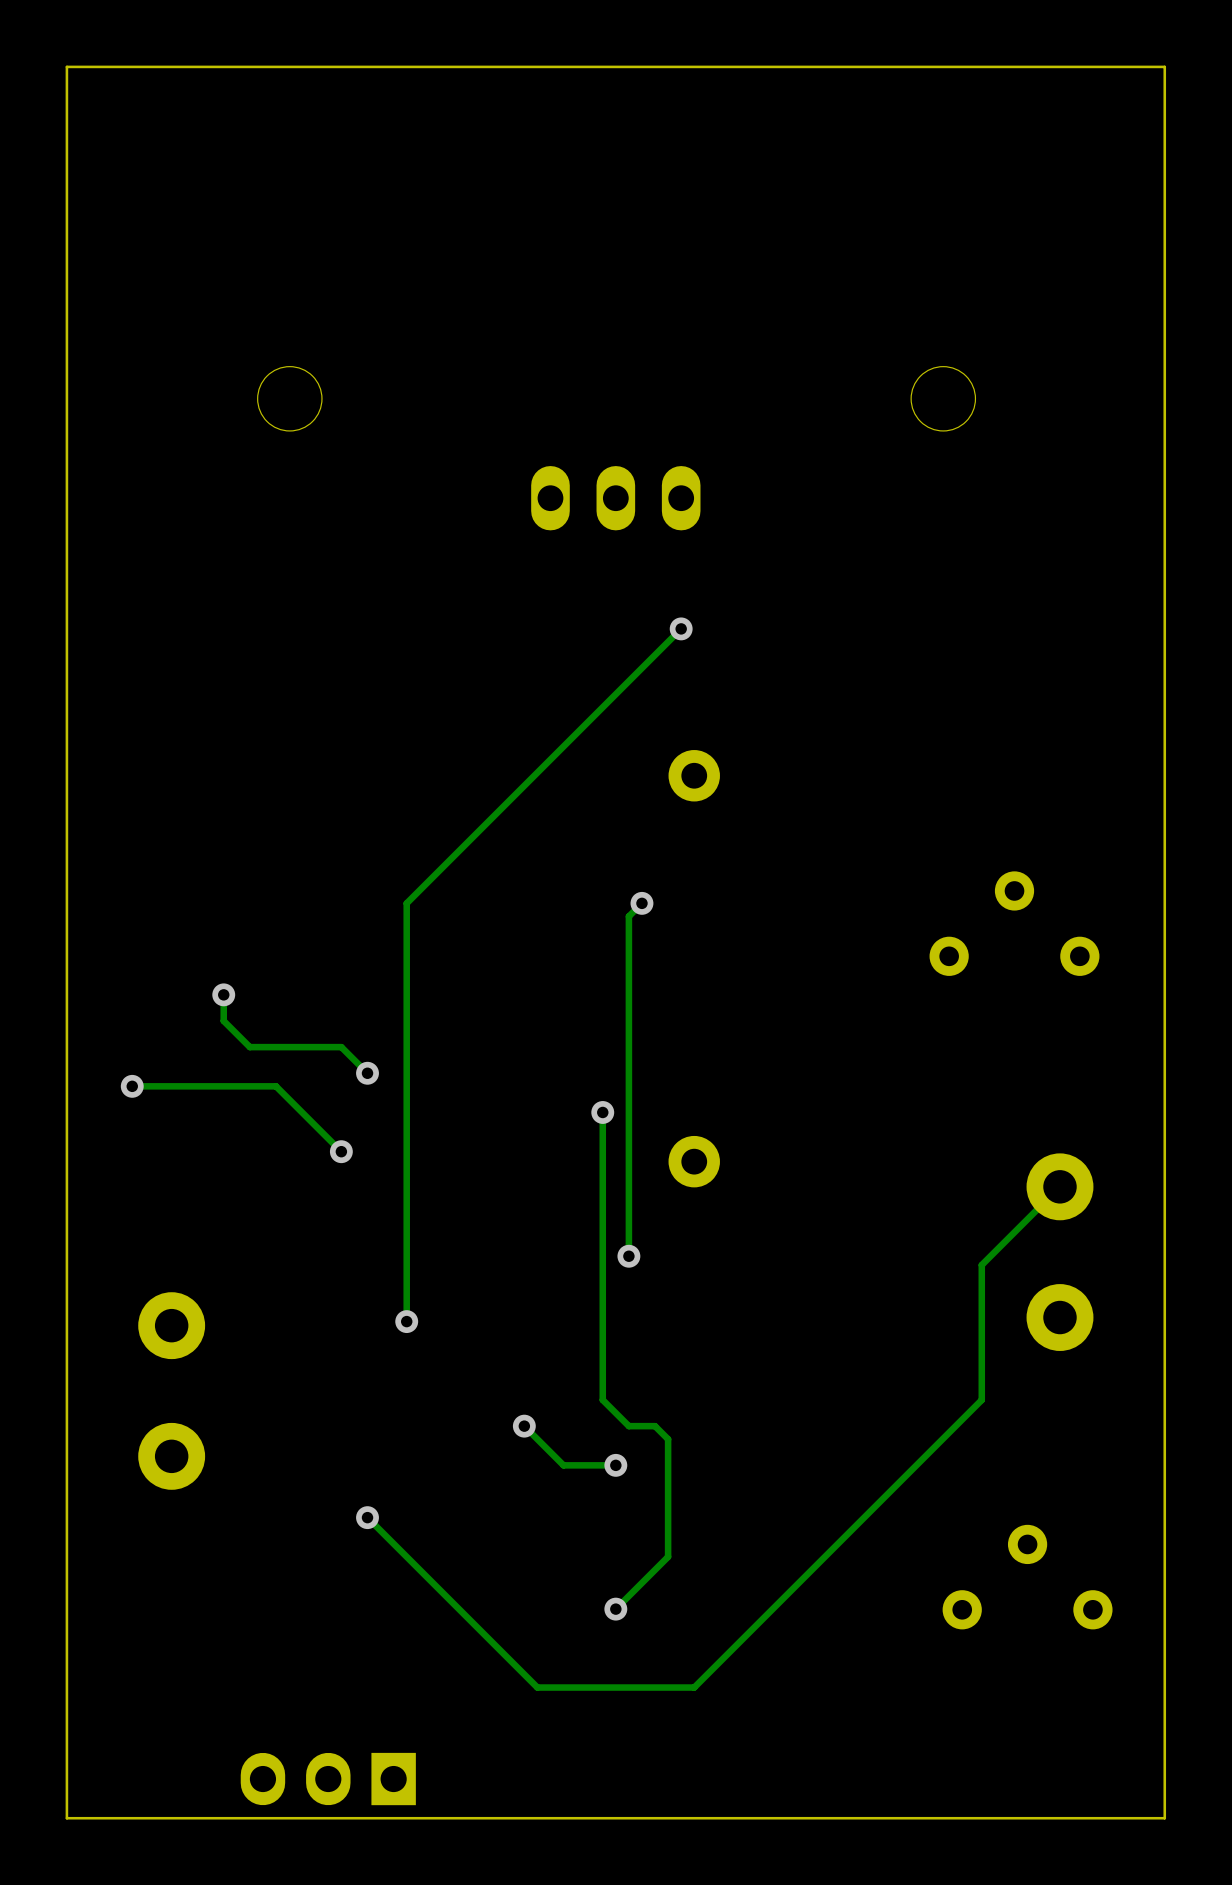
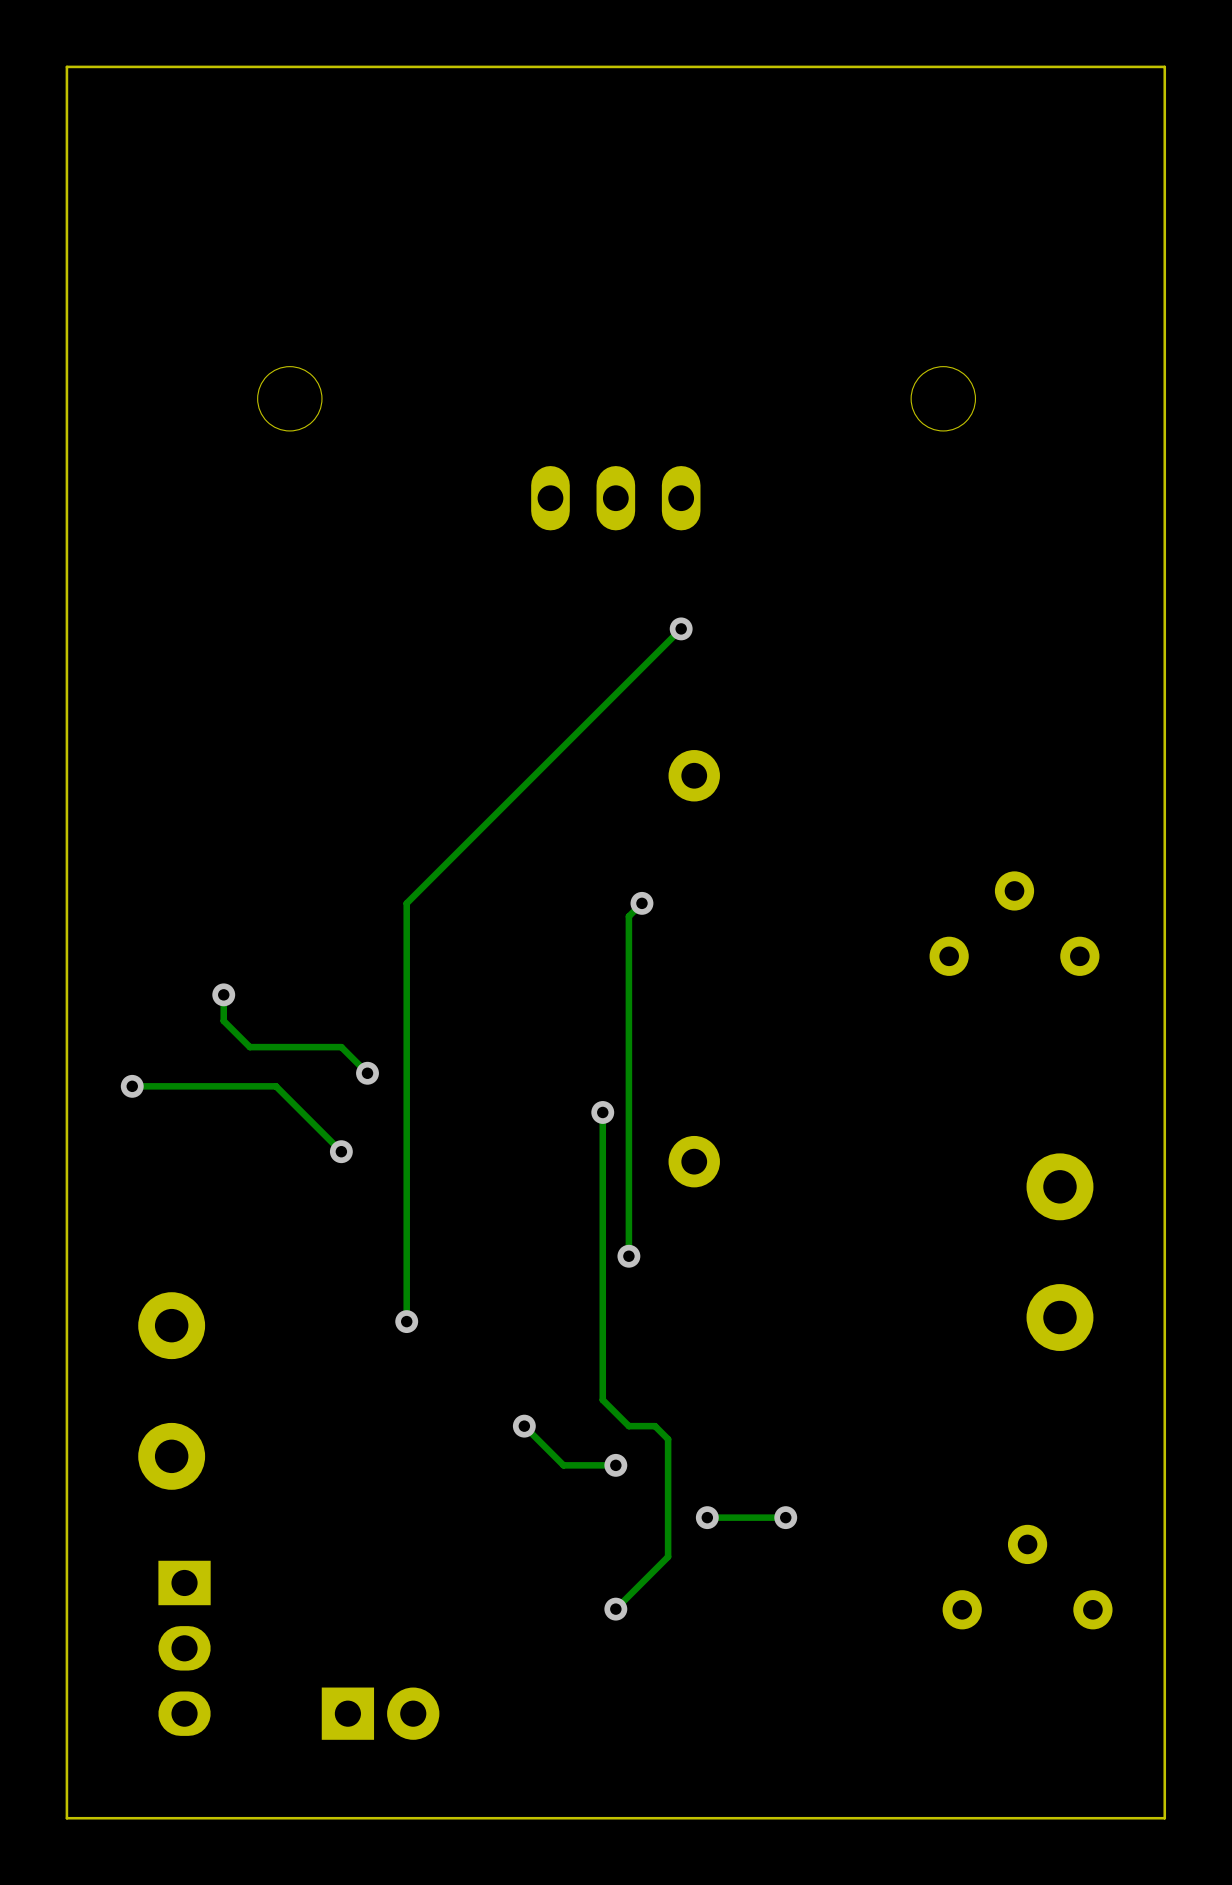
track: (1059, 1186) (981, 1265) (981, 1400) (694, 1687) (537, 1687) (367, 1517) -> none
via: (367, 1517) -> none
via: none -> (707, 1517)
track: none -> (785, 1517) (707, 1517)
via: none -> (785, 1517)
part: none -> (380, 1713)
part rotation: 0° (328, 1779) -> 90° counterclockwise (184, 1648)
part position: (328, 1779) -> (184, 1648)

